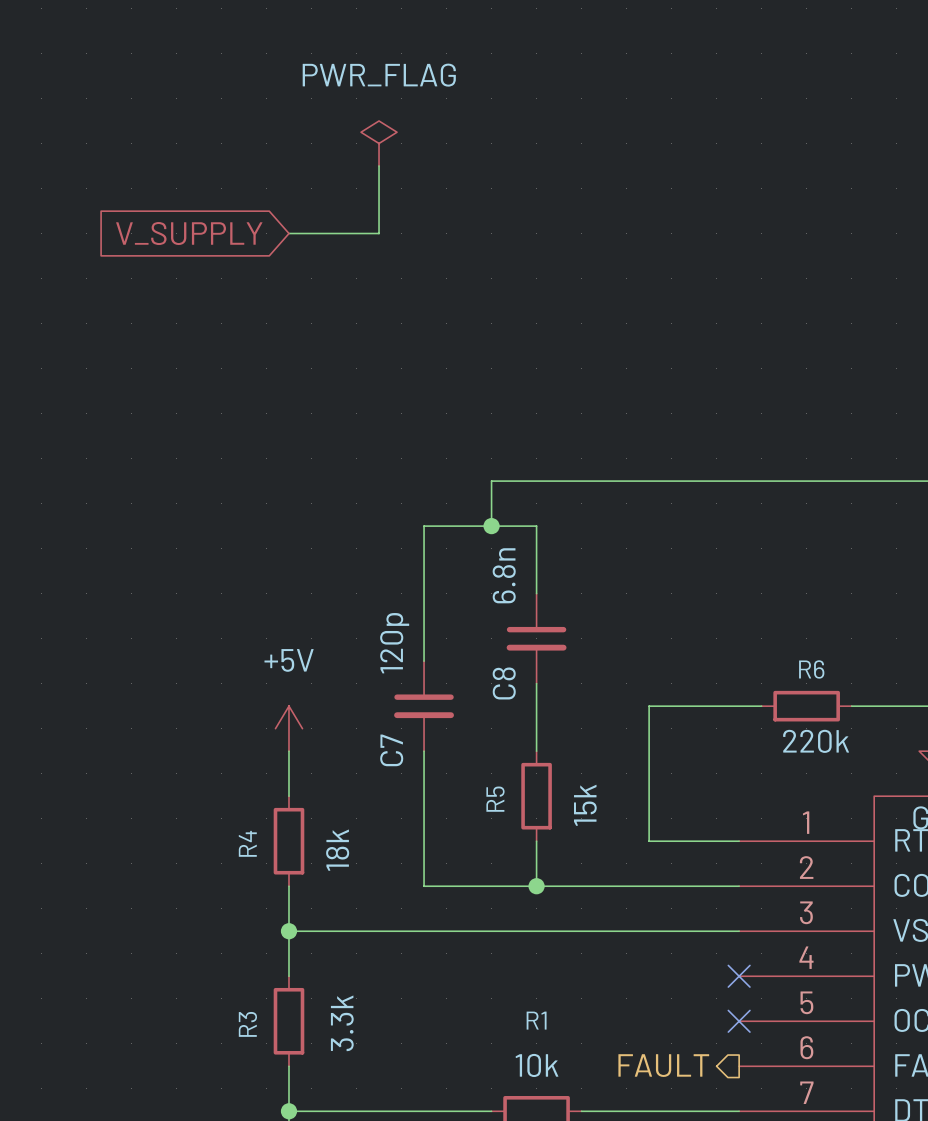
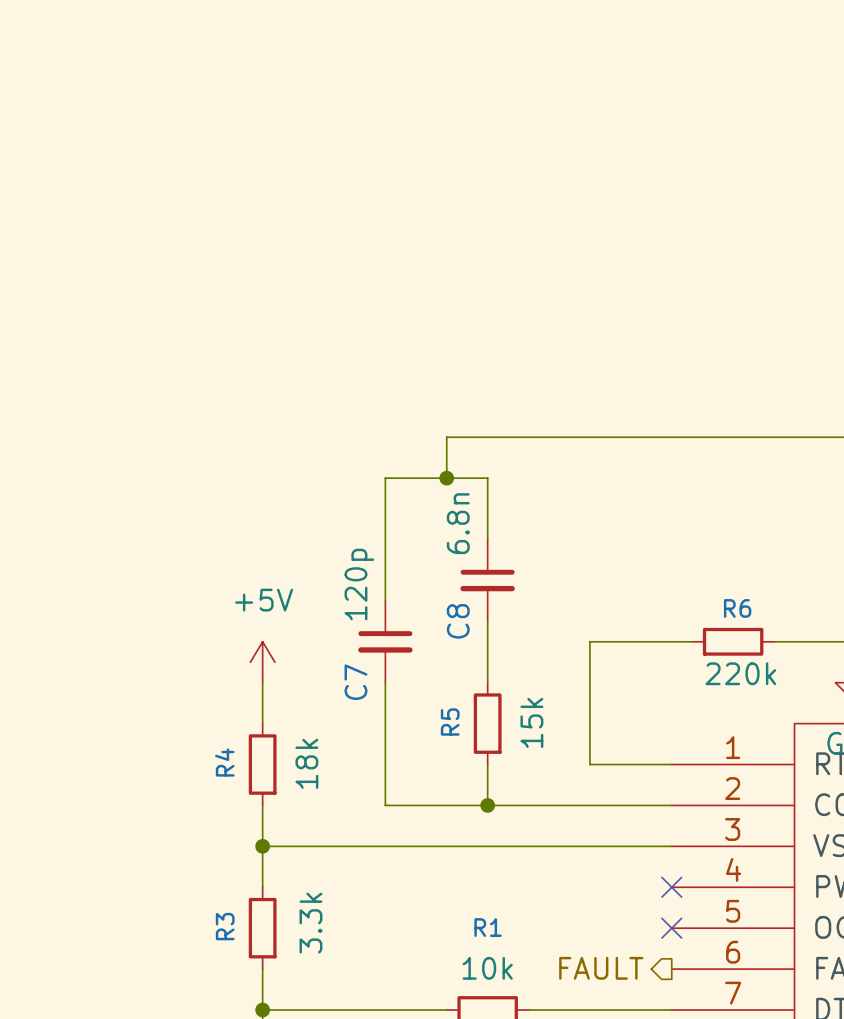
power symbol: PWR_FLAG (379, 143) -> none
wire: (379, 165) (379, 233) (288, 233) -> none
global label: V_SUPPLY (189, 233) -> none

